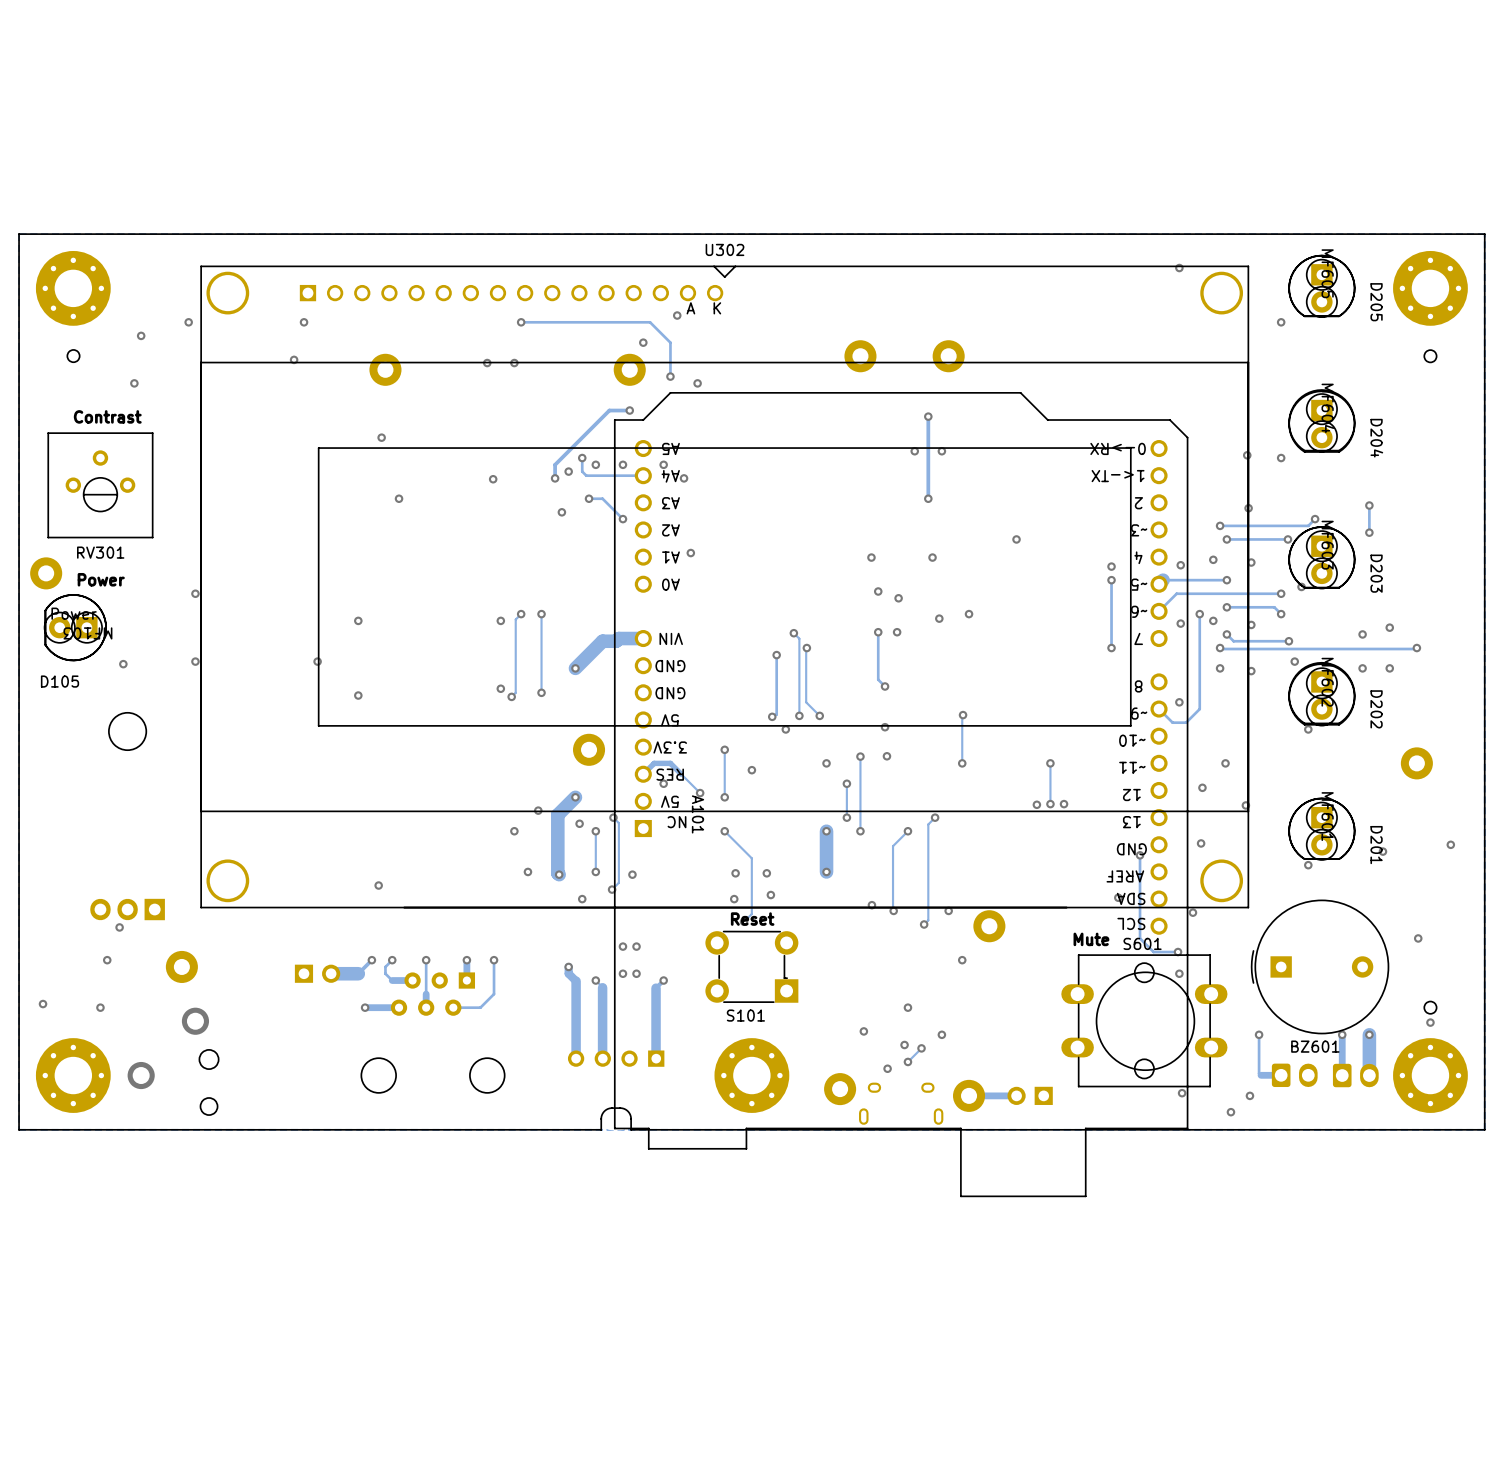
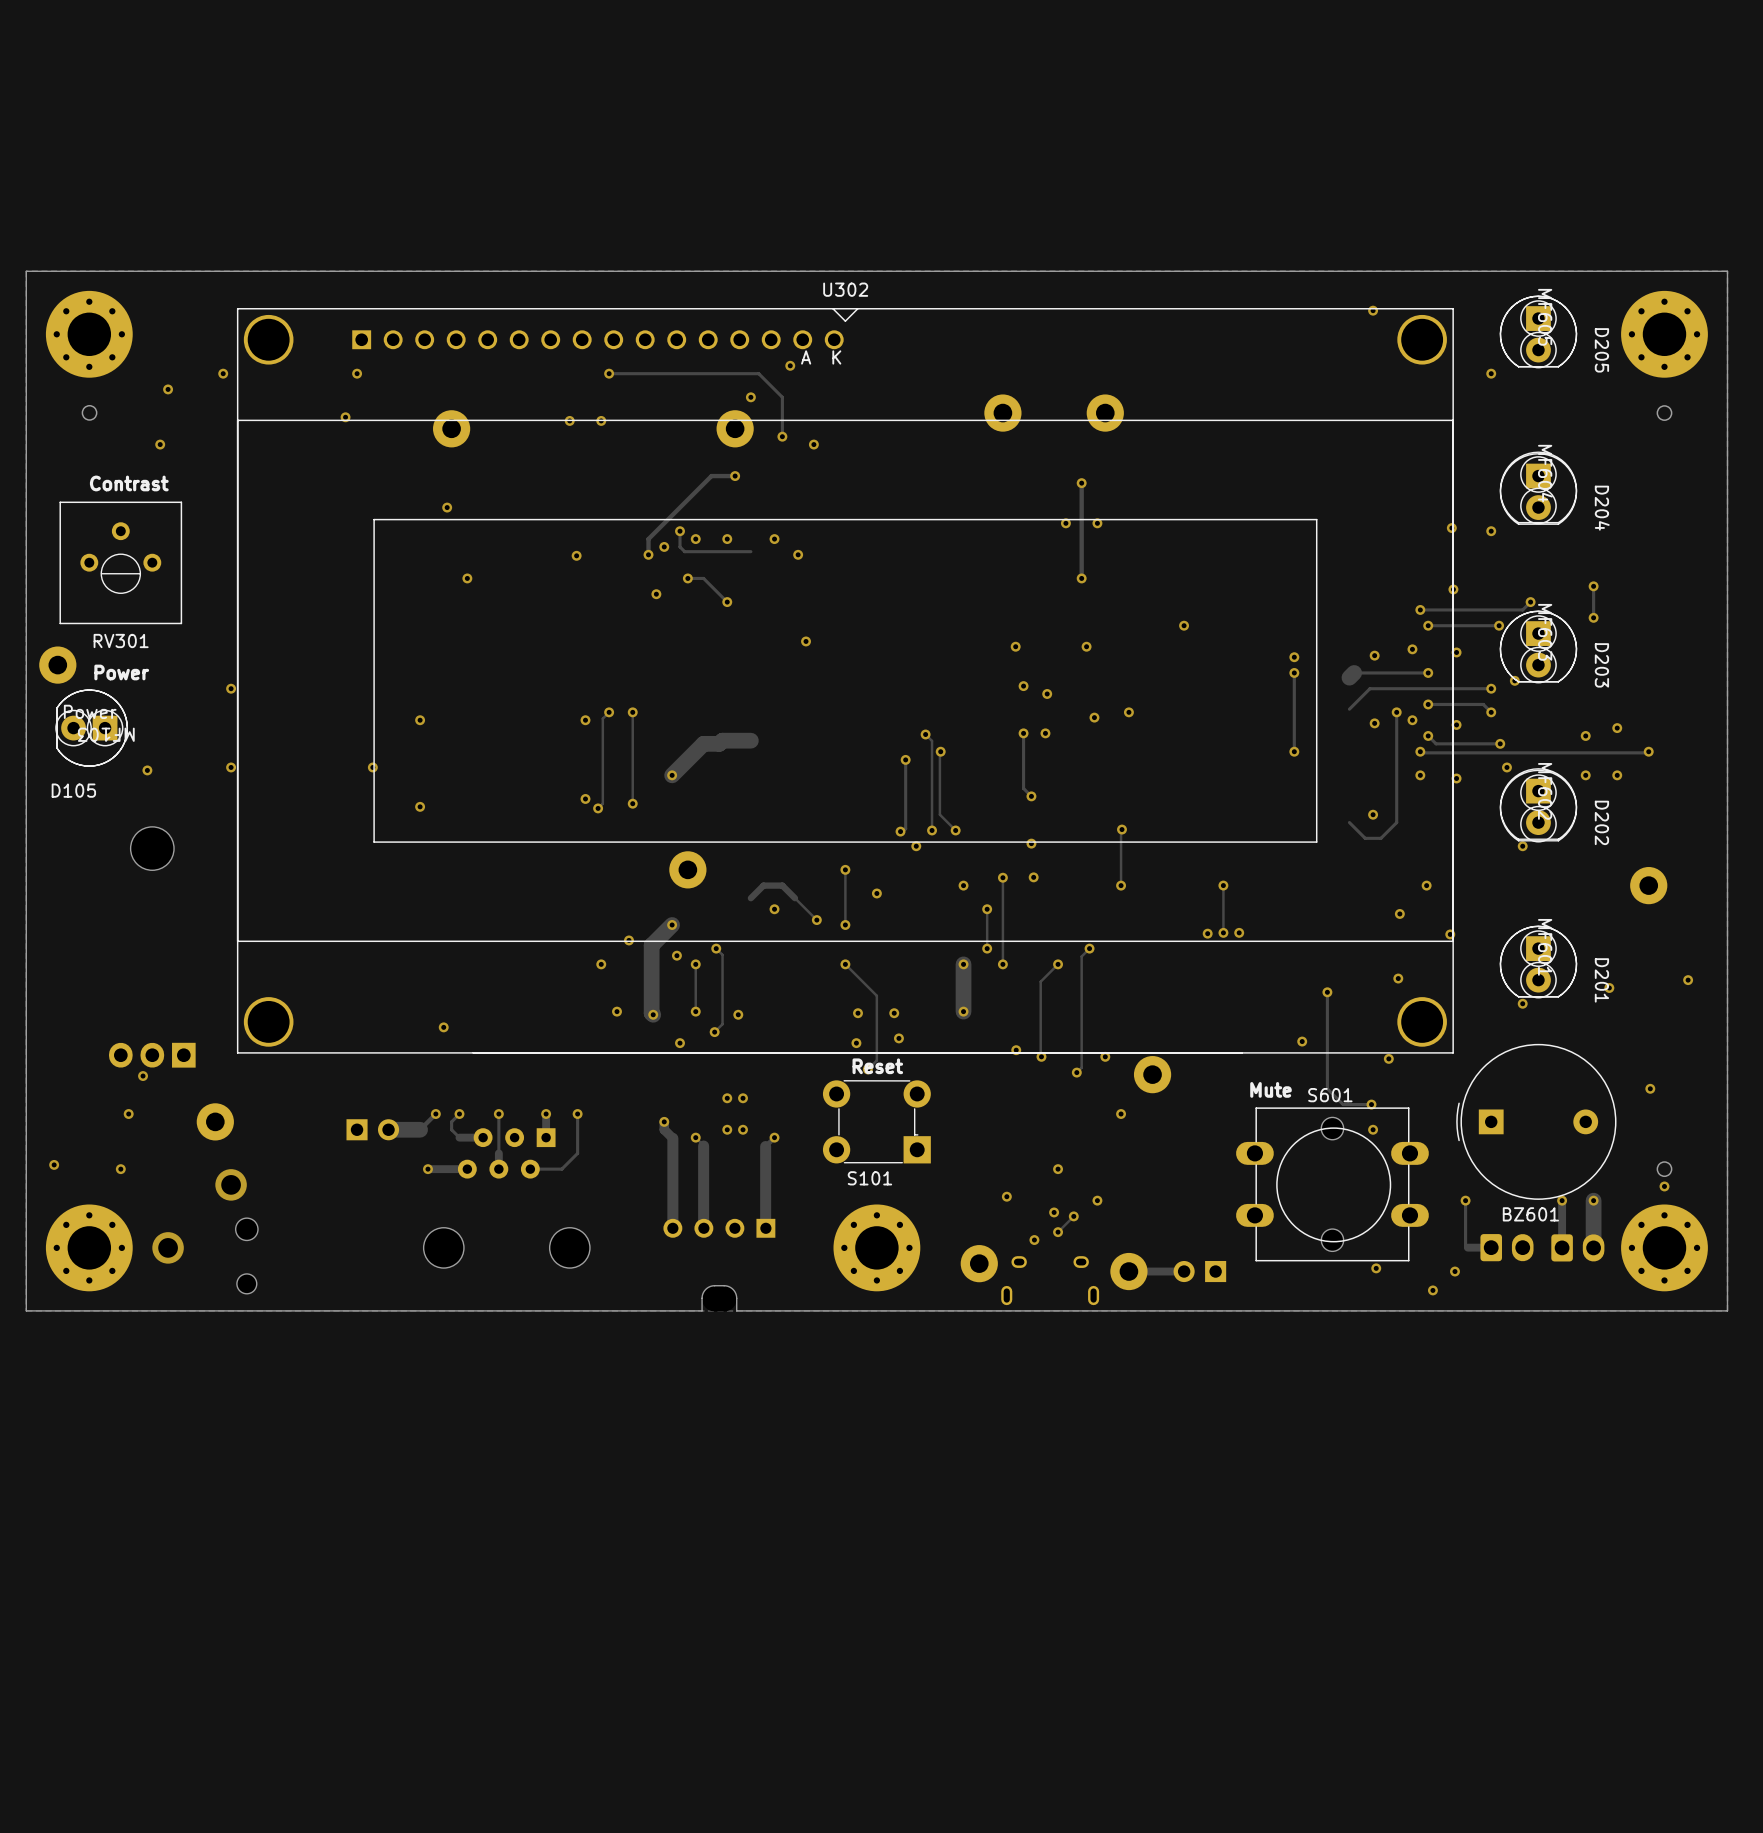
A101: (901, 794) -> none

